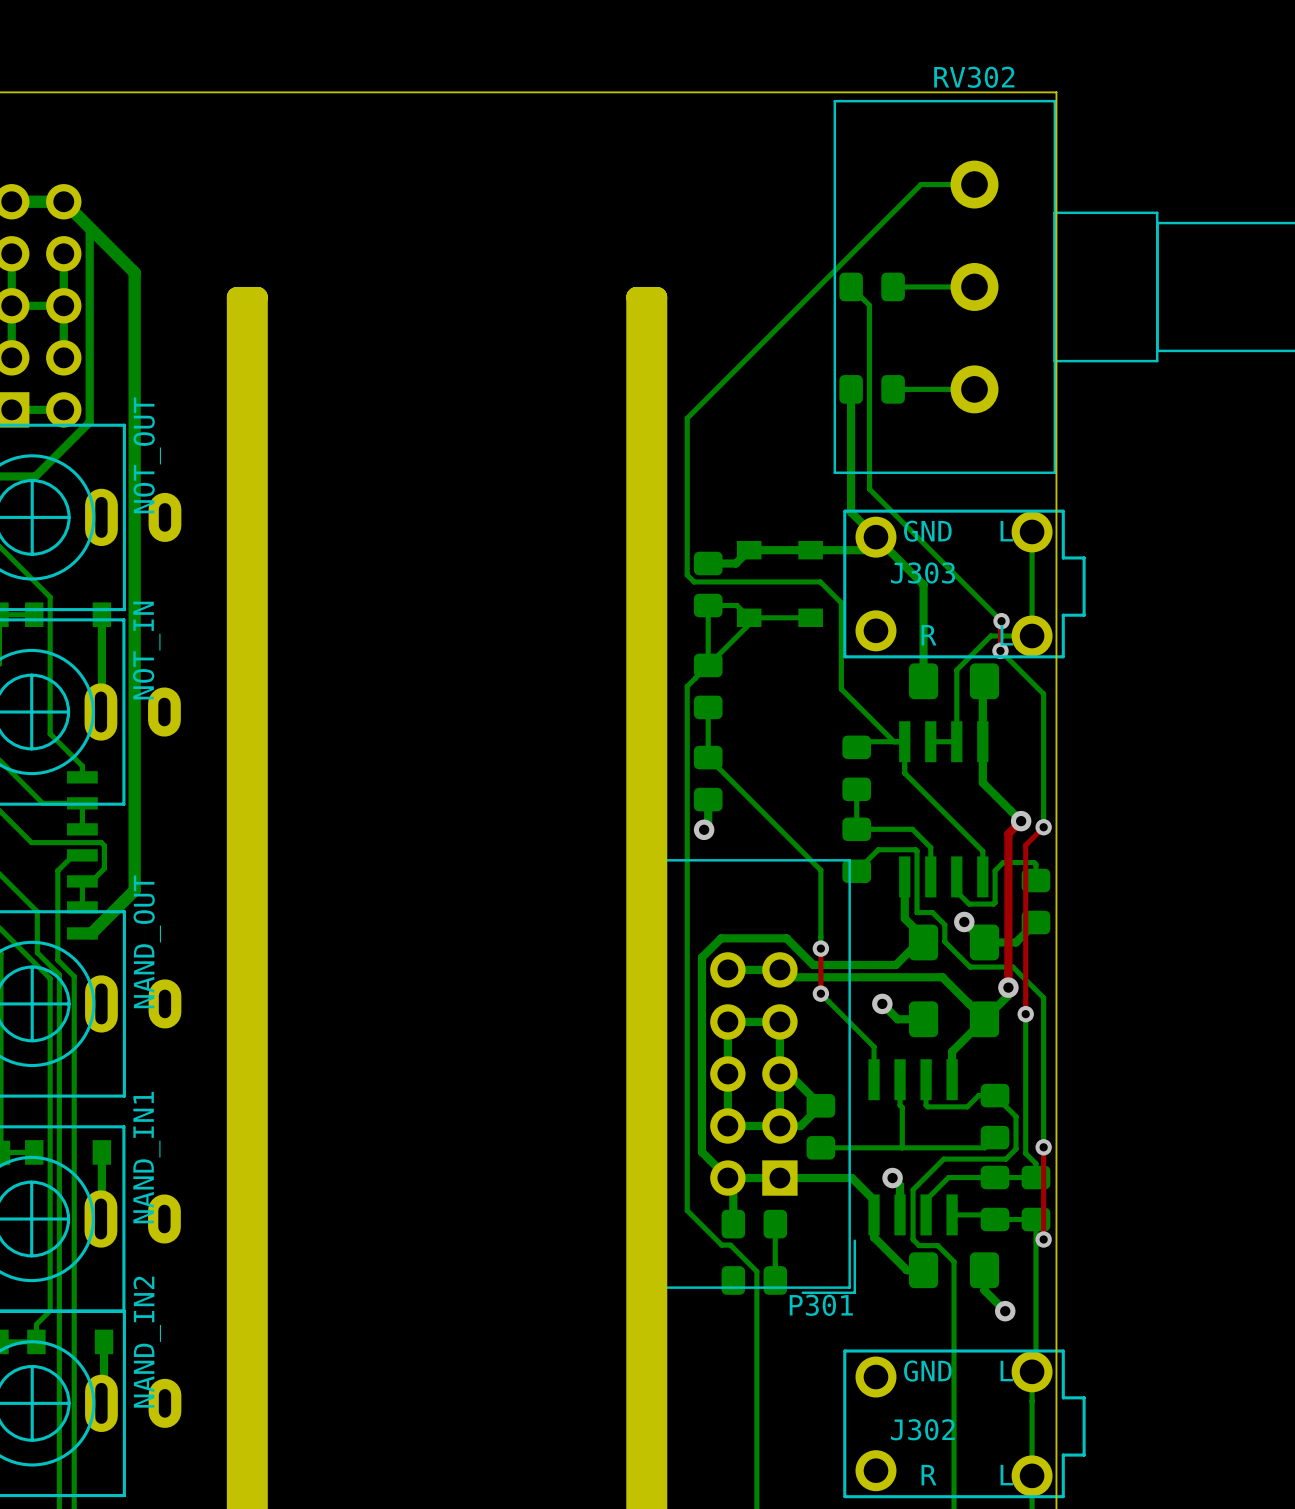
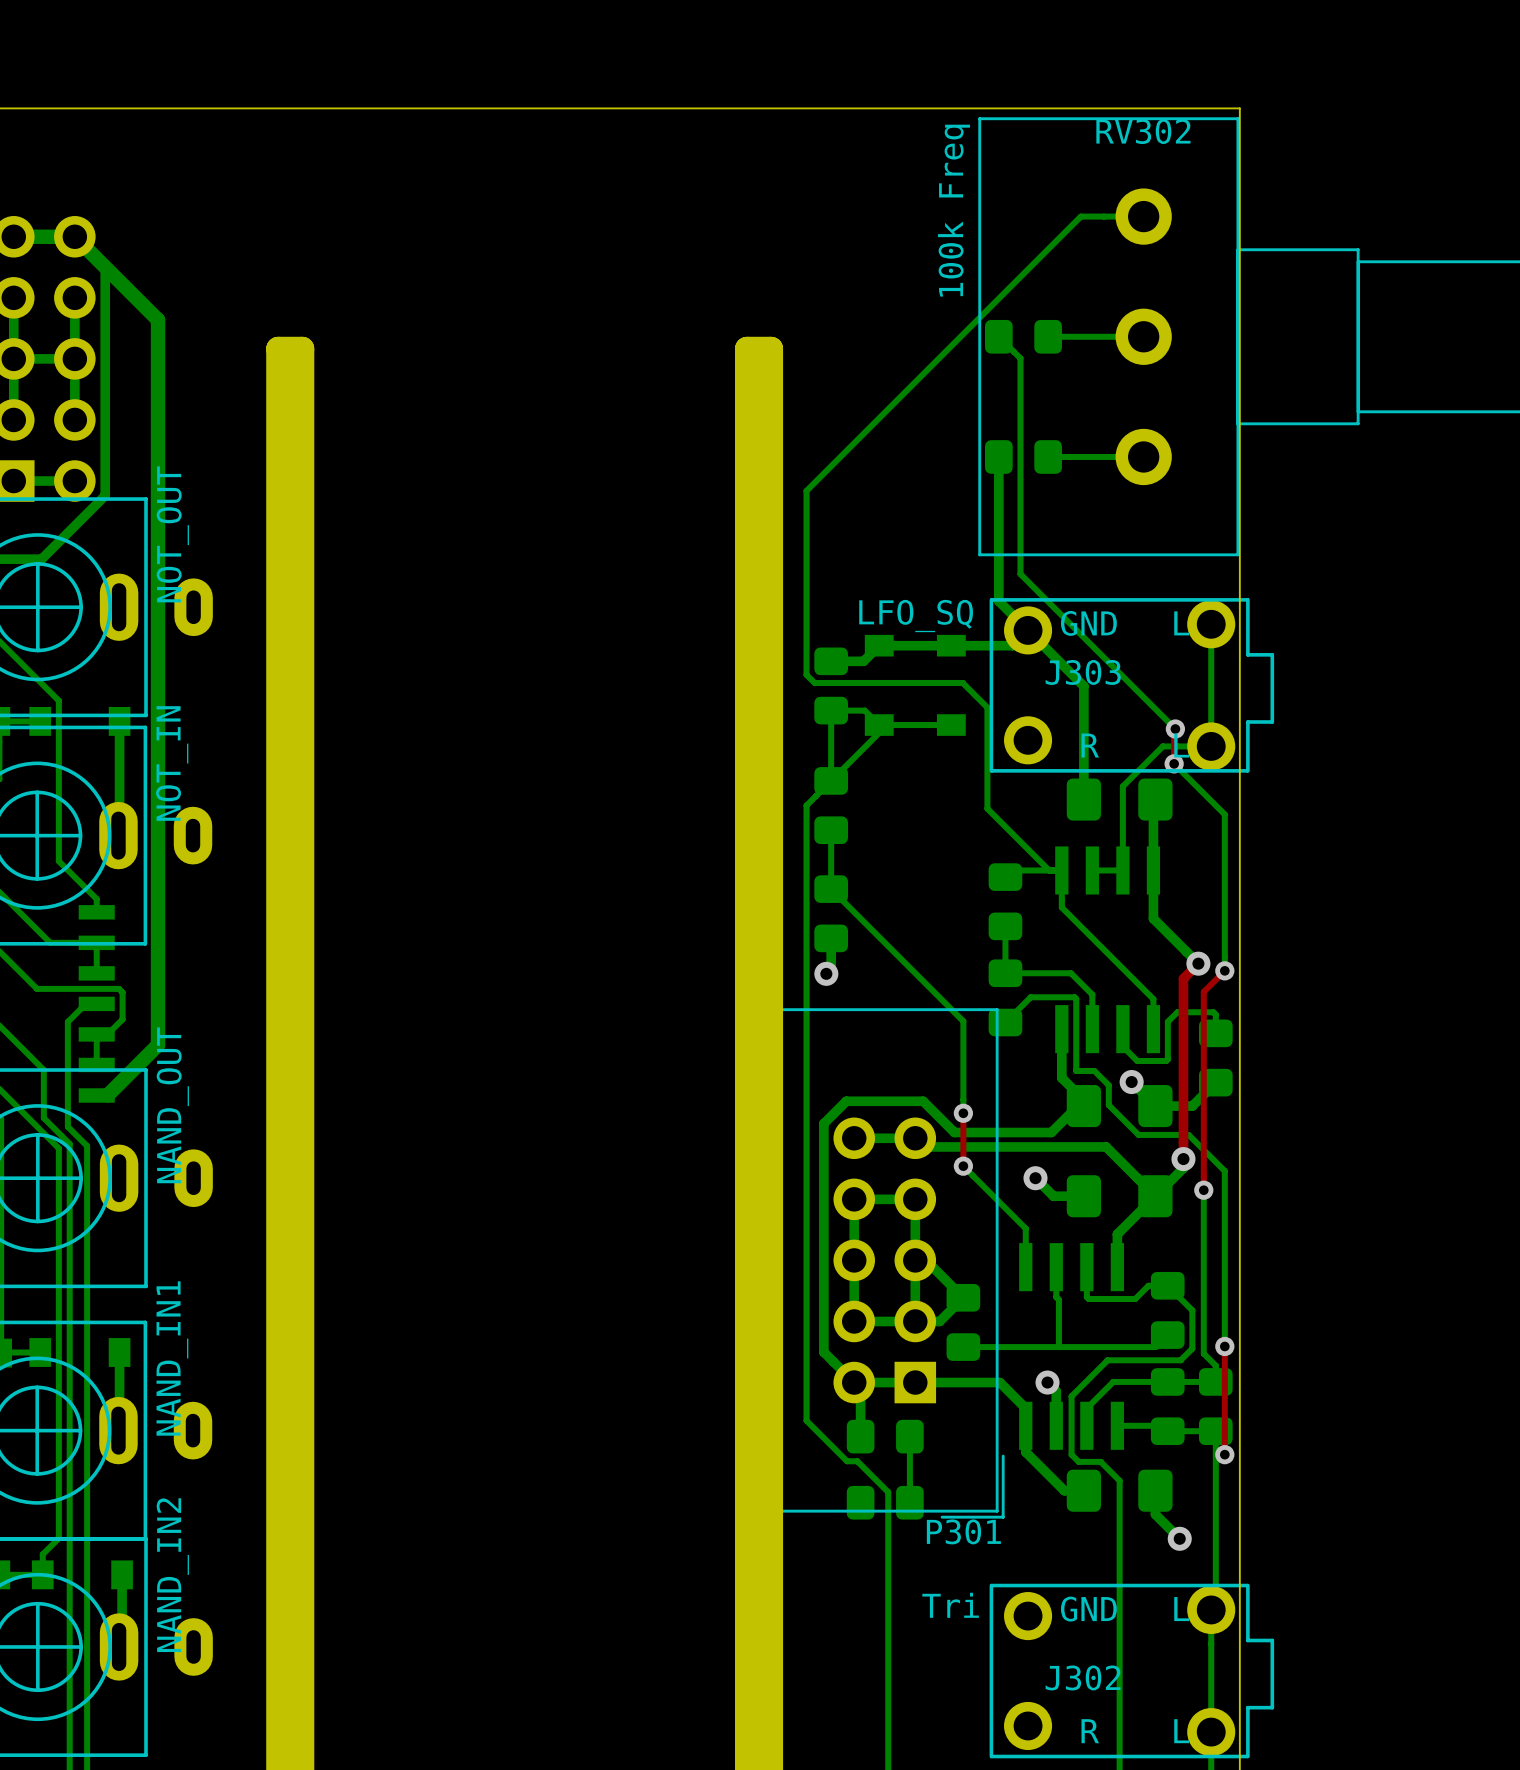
RV302 name position: RV302 (974, 77) -> RV302 (1143, 131)
RV302 value: none -> 100k Freq (954, 210)
J303 value: none -> LFO_SQ (916, 616)
J302 value: none -> Tri (950, 1605)

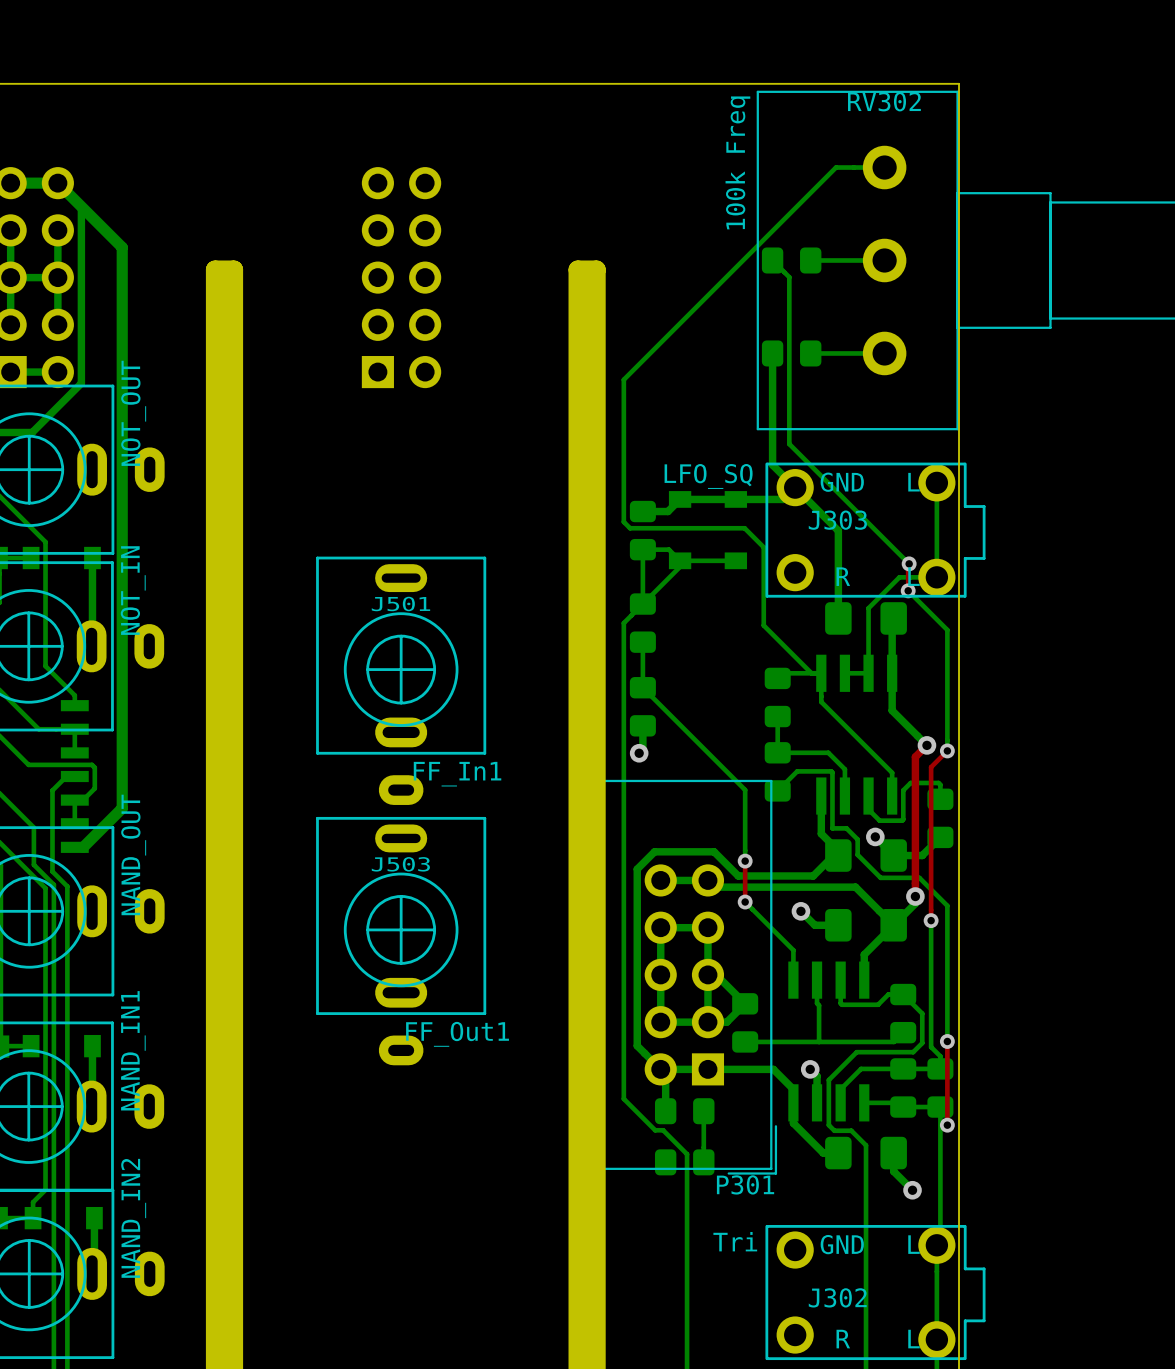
part: none -> (401, 277)
J501: none -> FF_In1 (401, 680)
J503: none -> FF_Out1 (401, 941)

